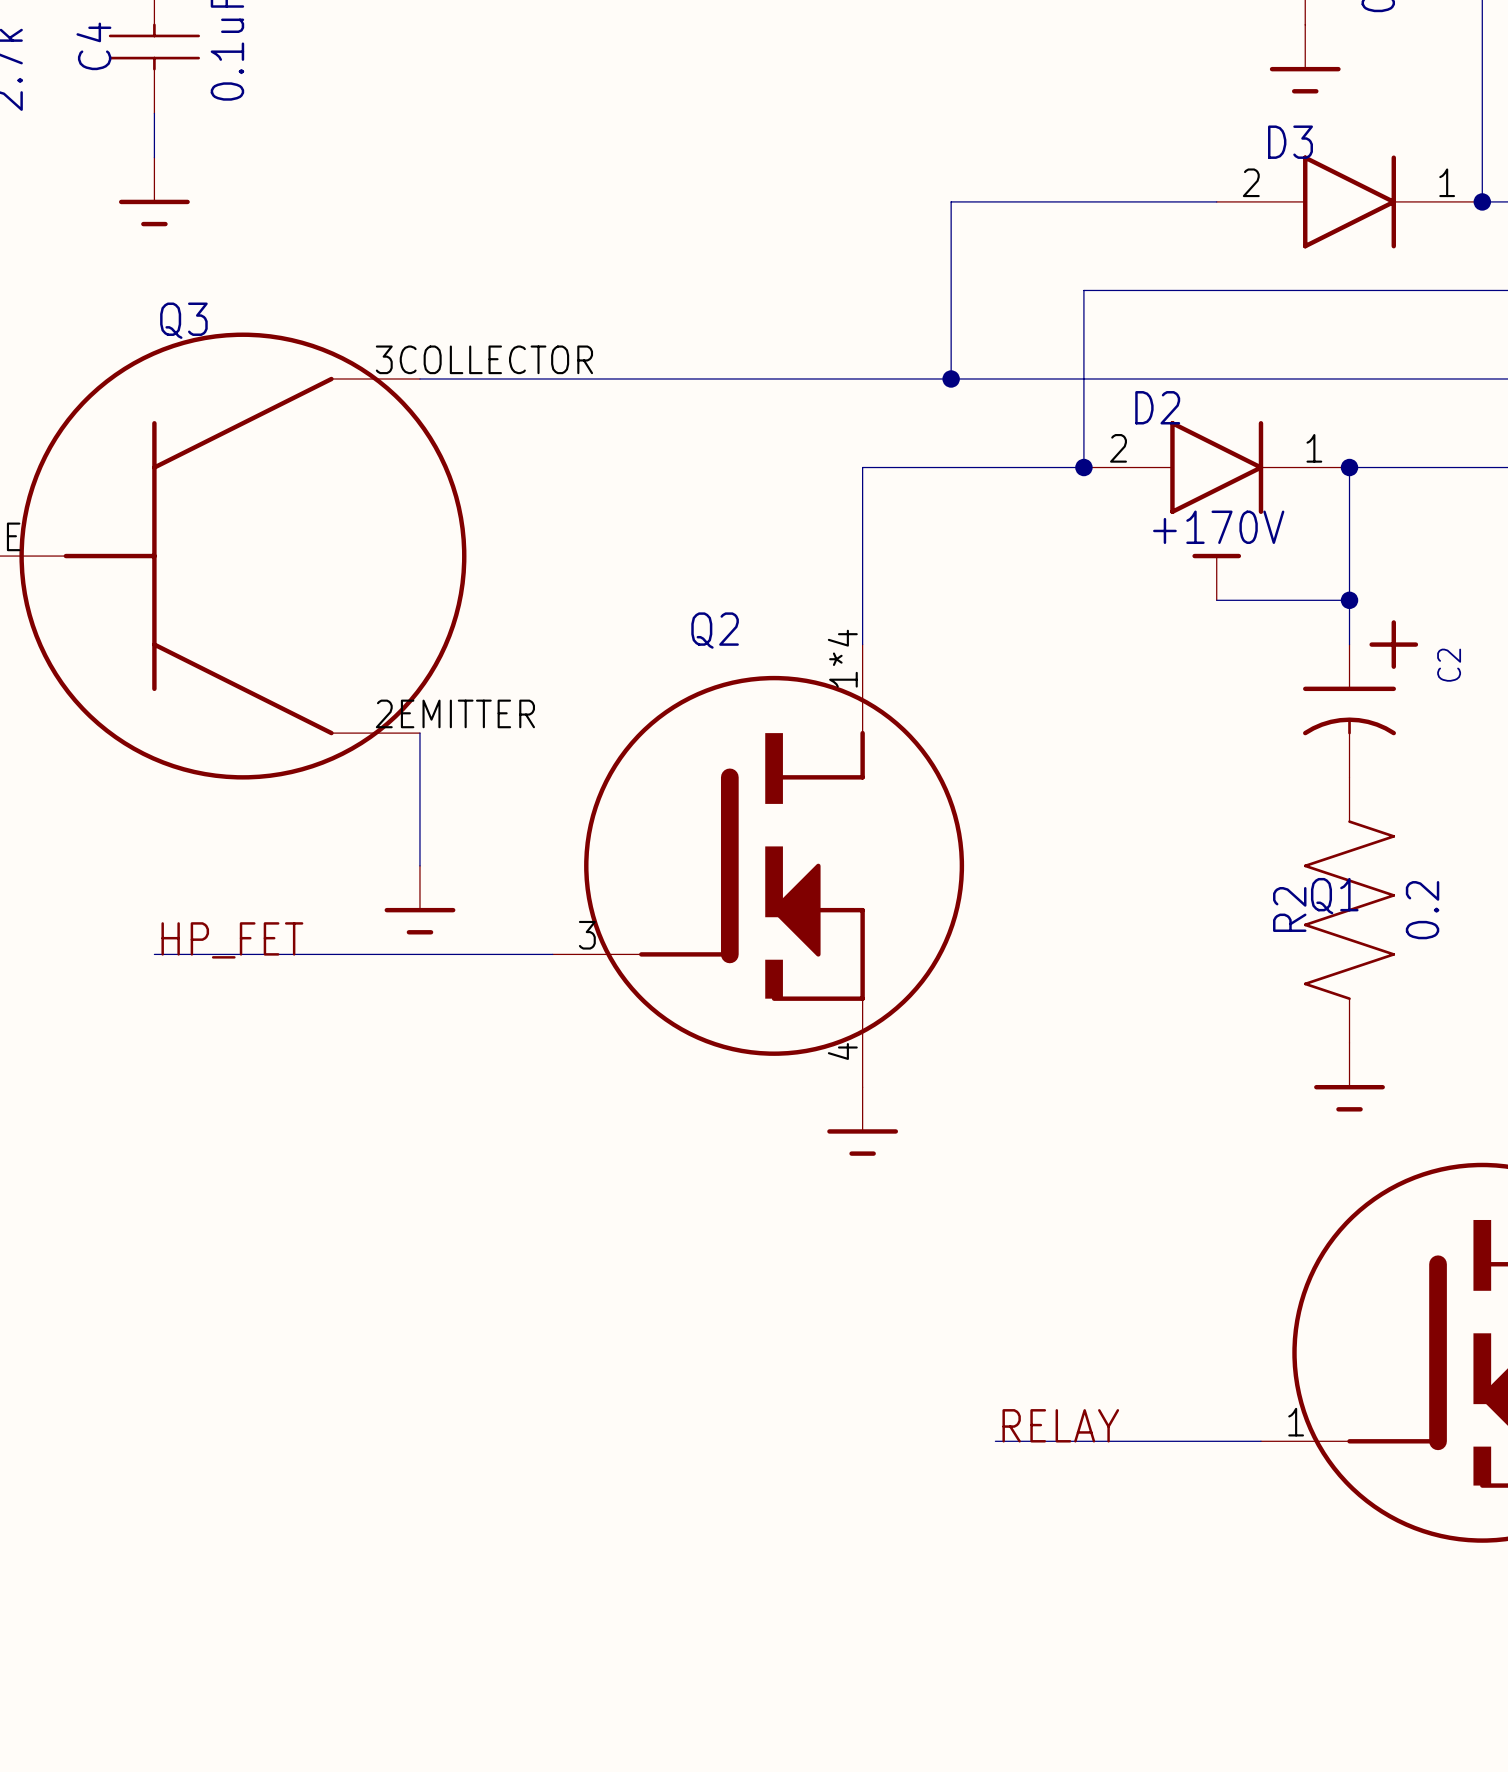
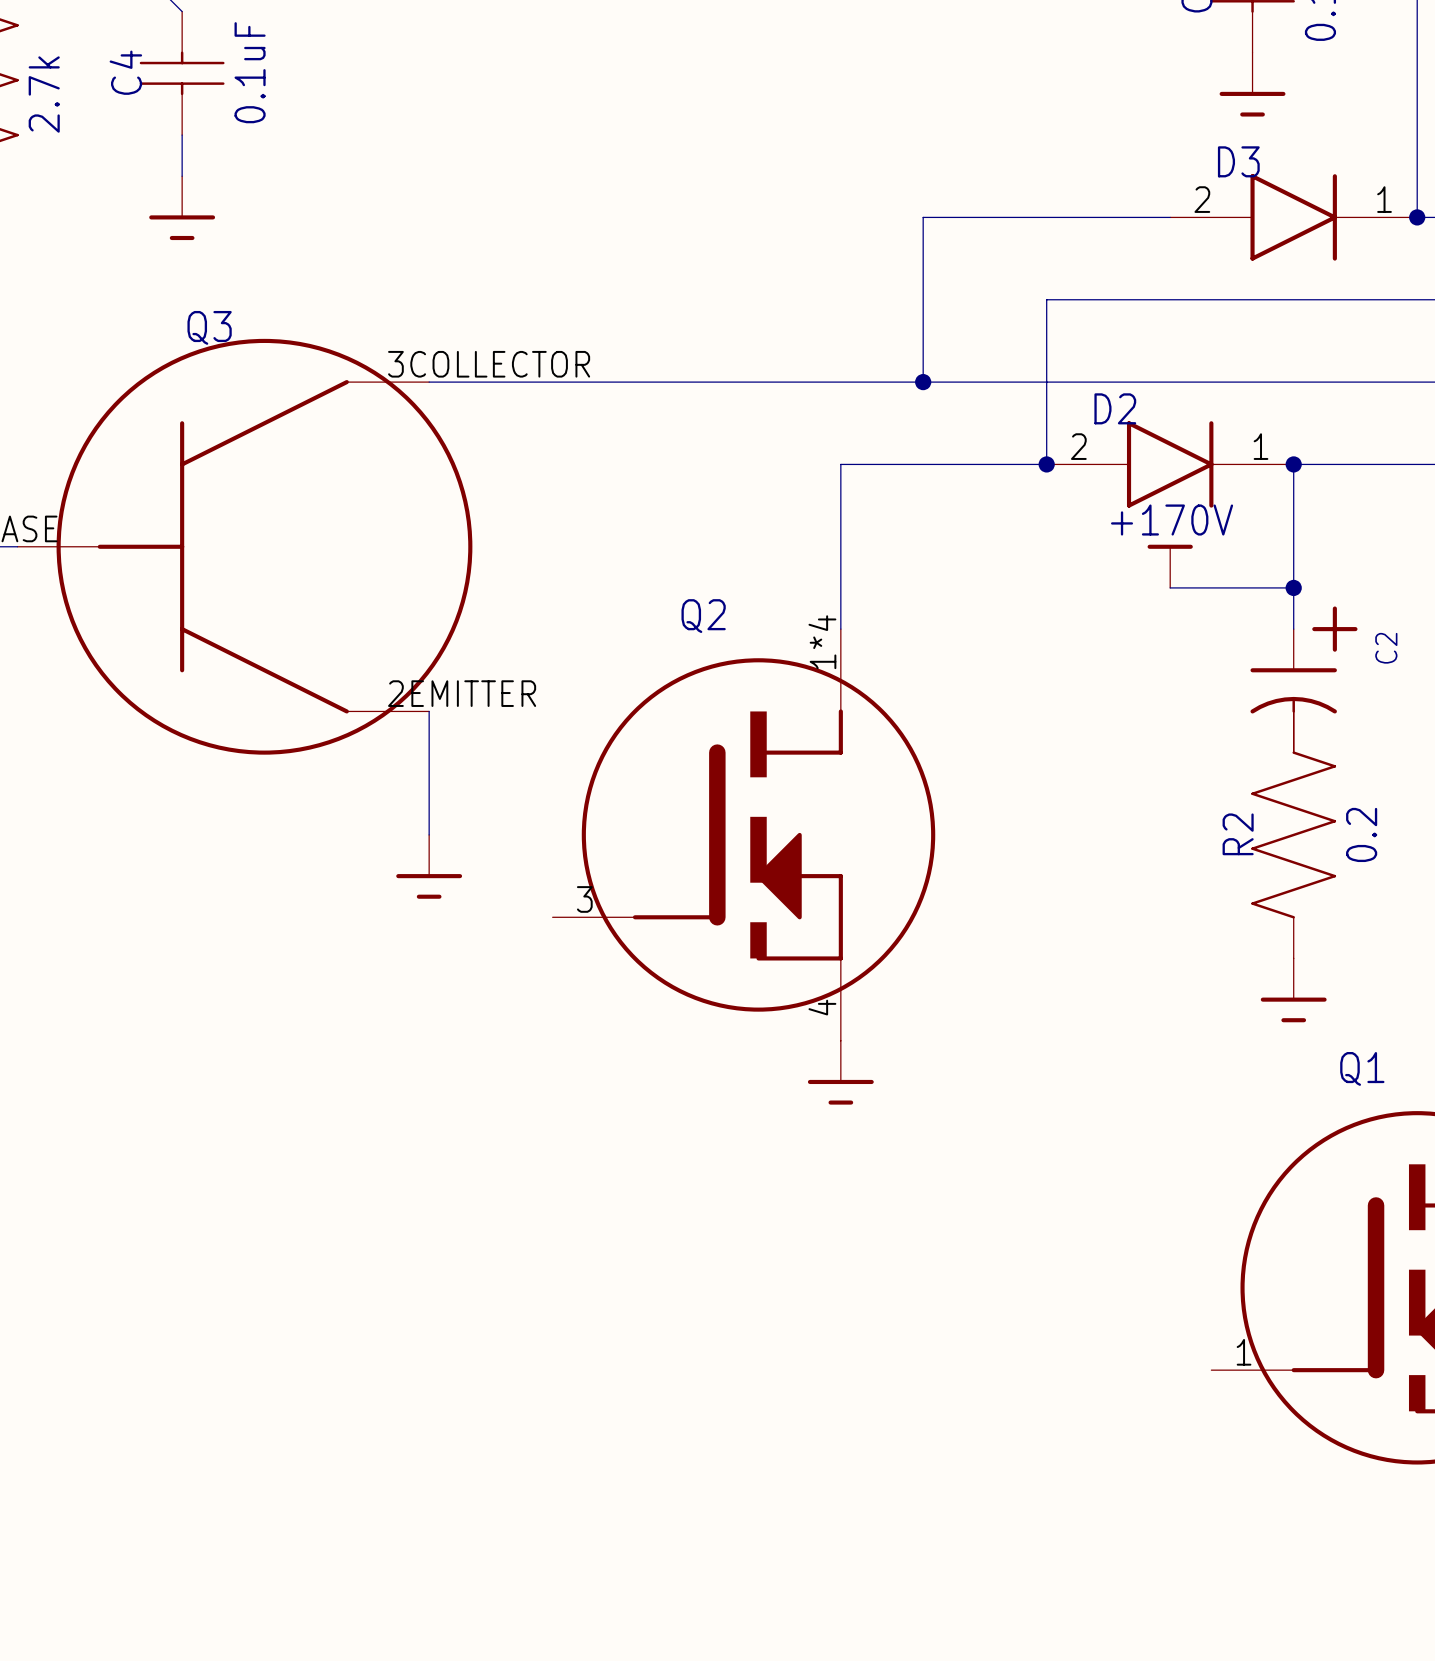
Q1 name position: Q1 (1334, 896) -> Q1 (1362, 1068)
R2 position: (1349, 910) -> (1293, 834)
label: HP_FET (232, 940) -> none
wire: (154, 954) (552, 954) -> none
power symbol position: (1349, 1077) -> (1293, 990)
label: RELAY (1060, 1425) -> none
wire: (995, 1441) (1260, 1441) -> none

